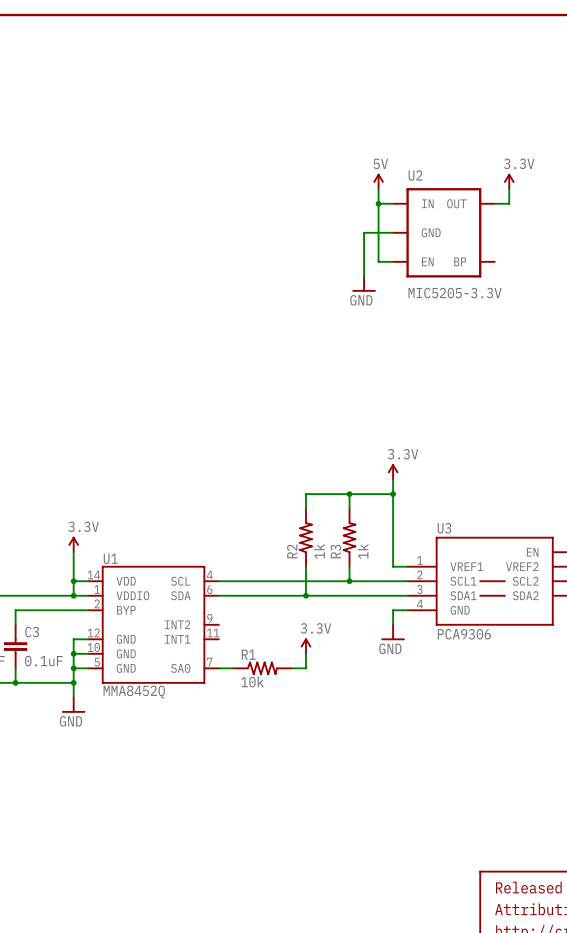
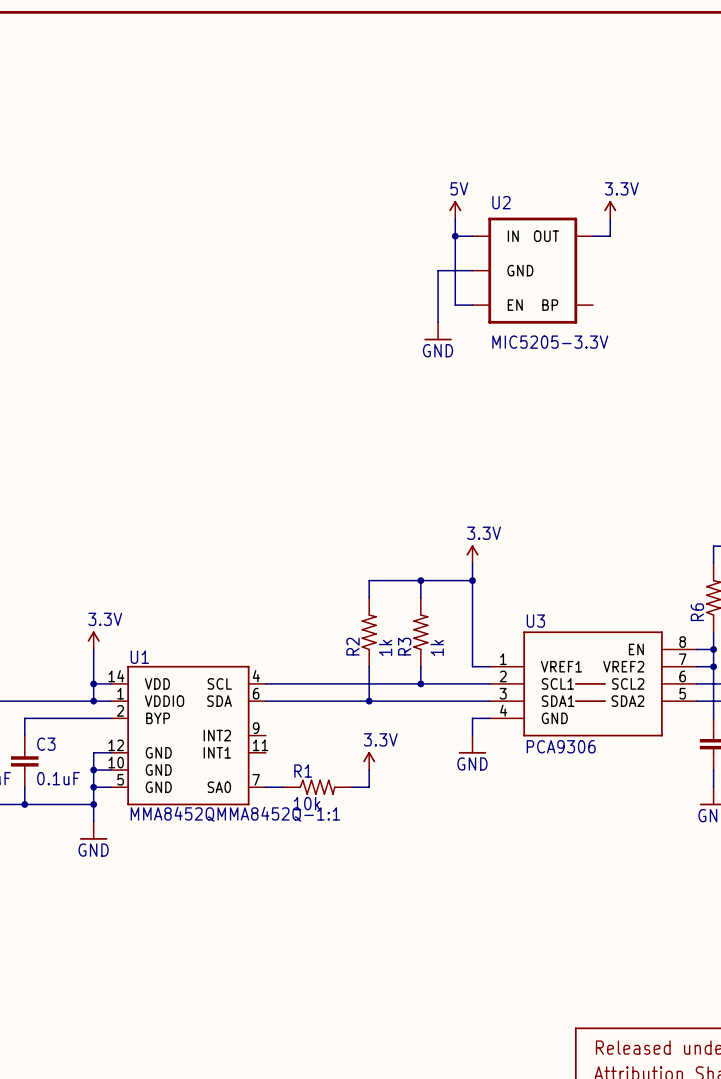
U1 value: MMA8452Q (134, 691) -> MMA8452QMMA8452Q-1:1 (235, 814)

